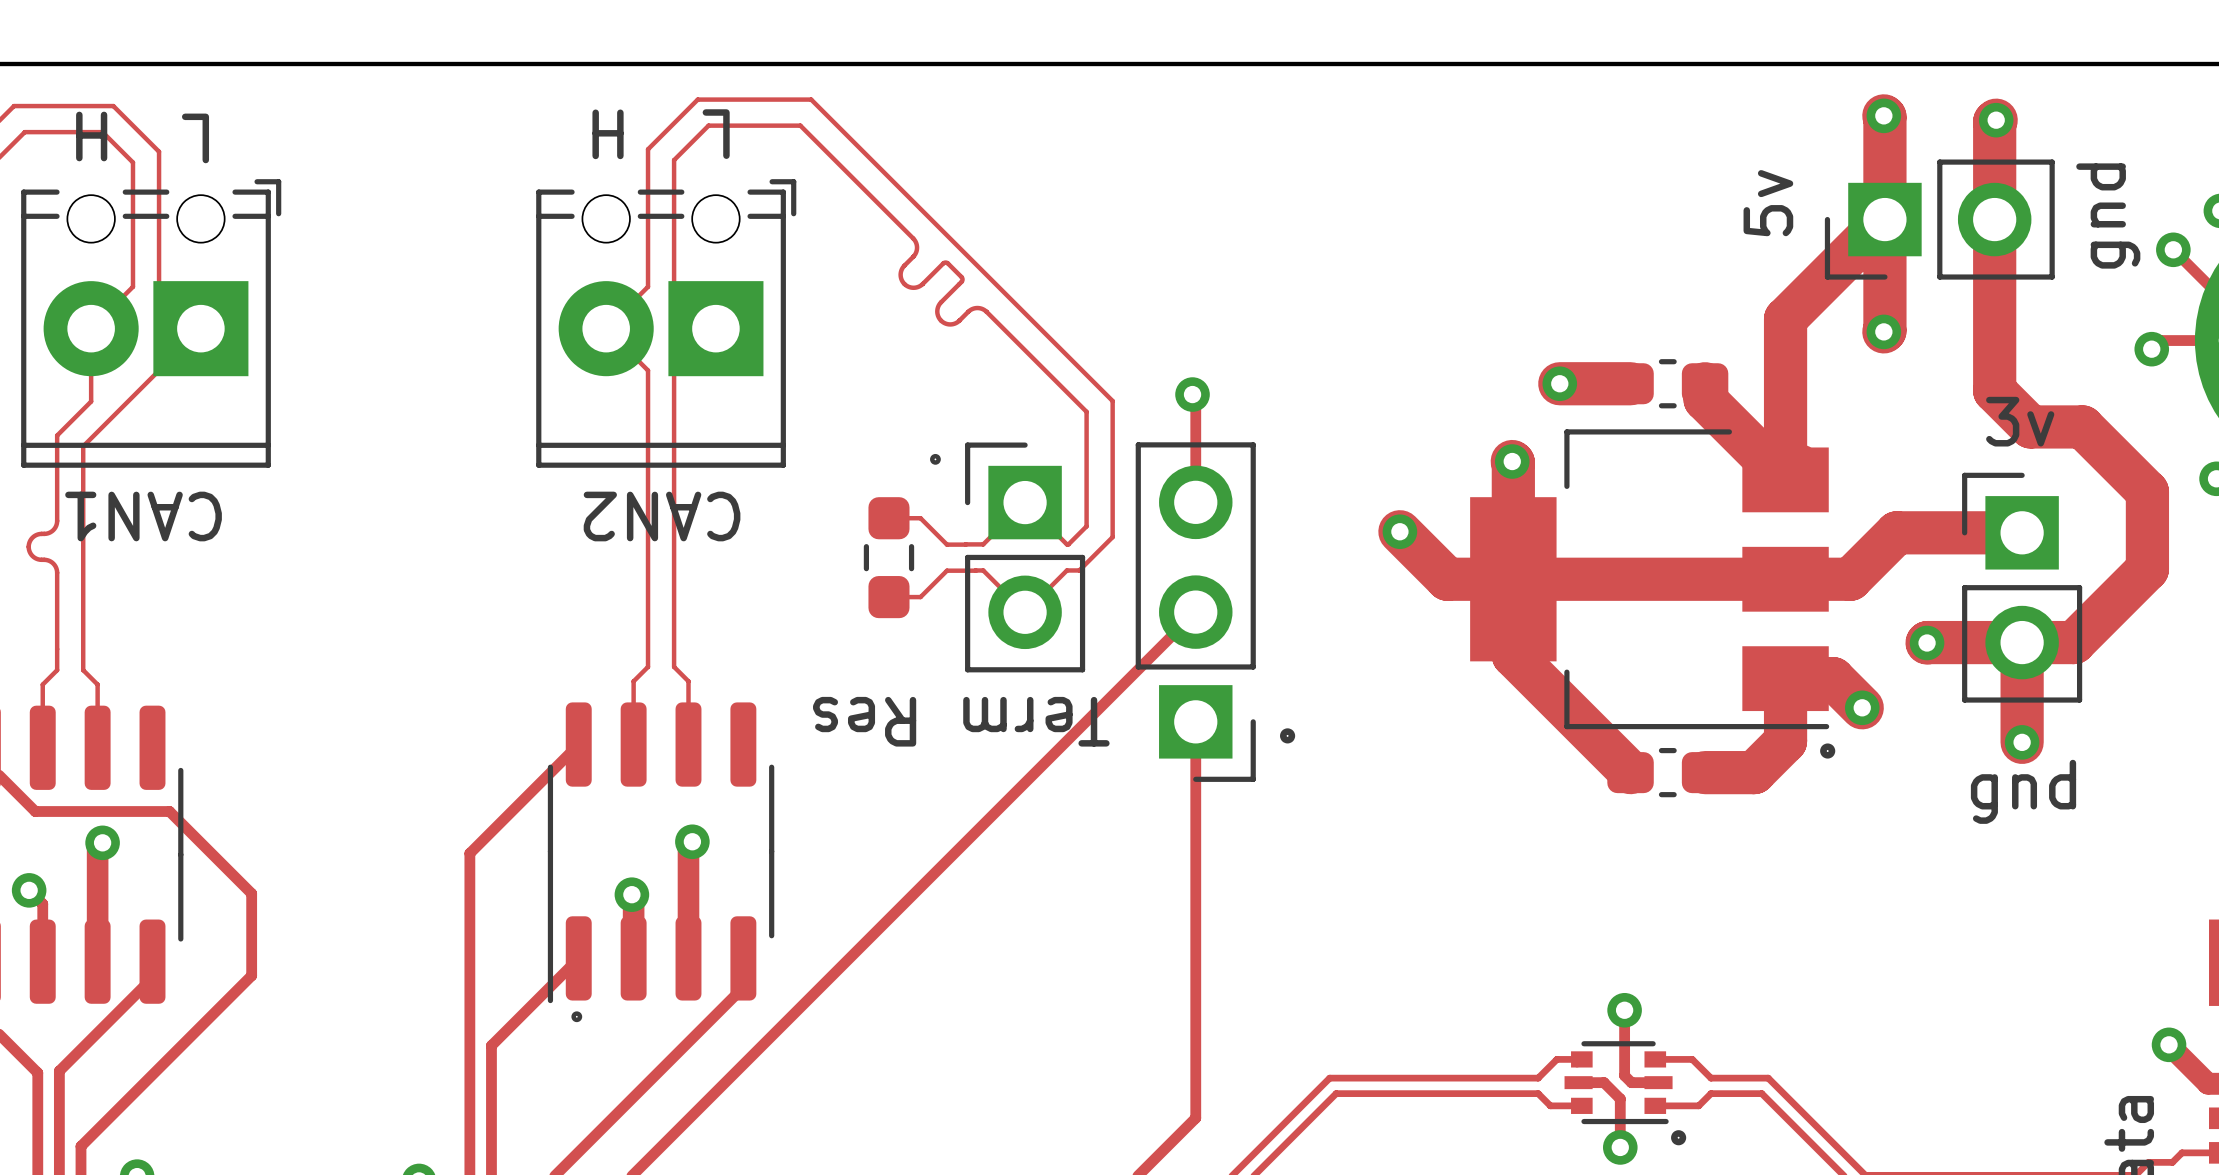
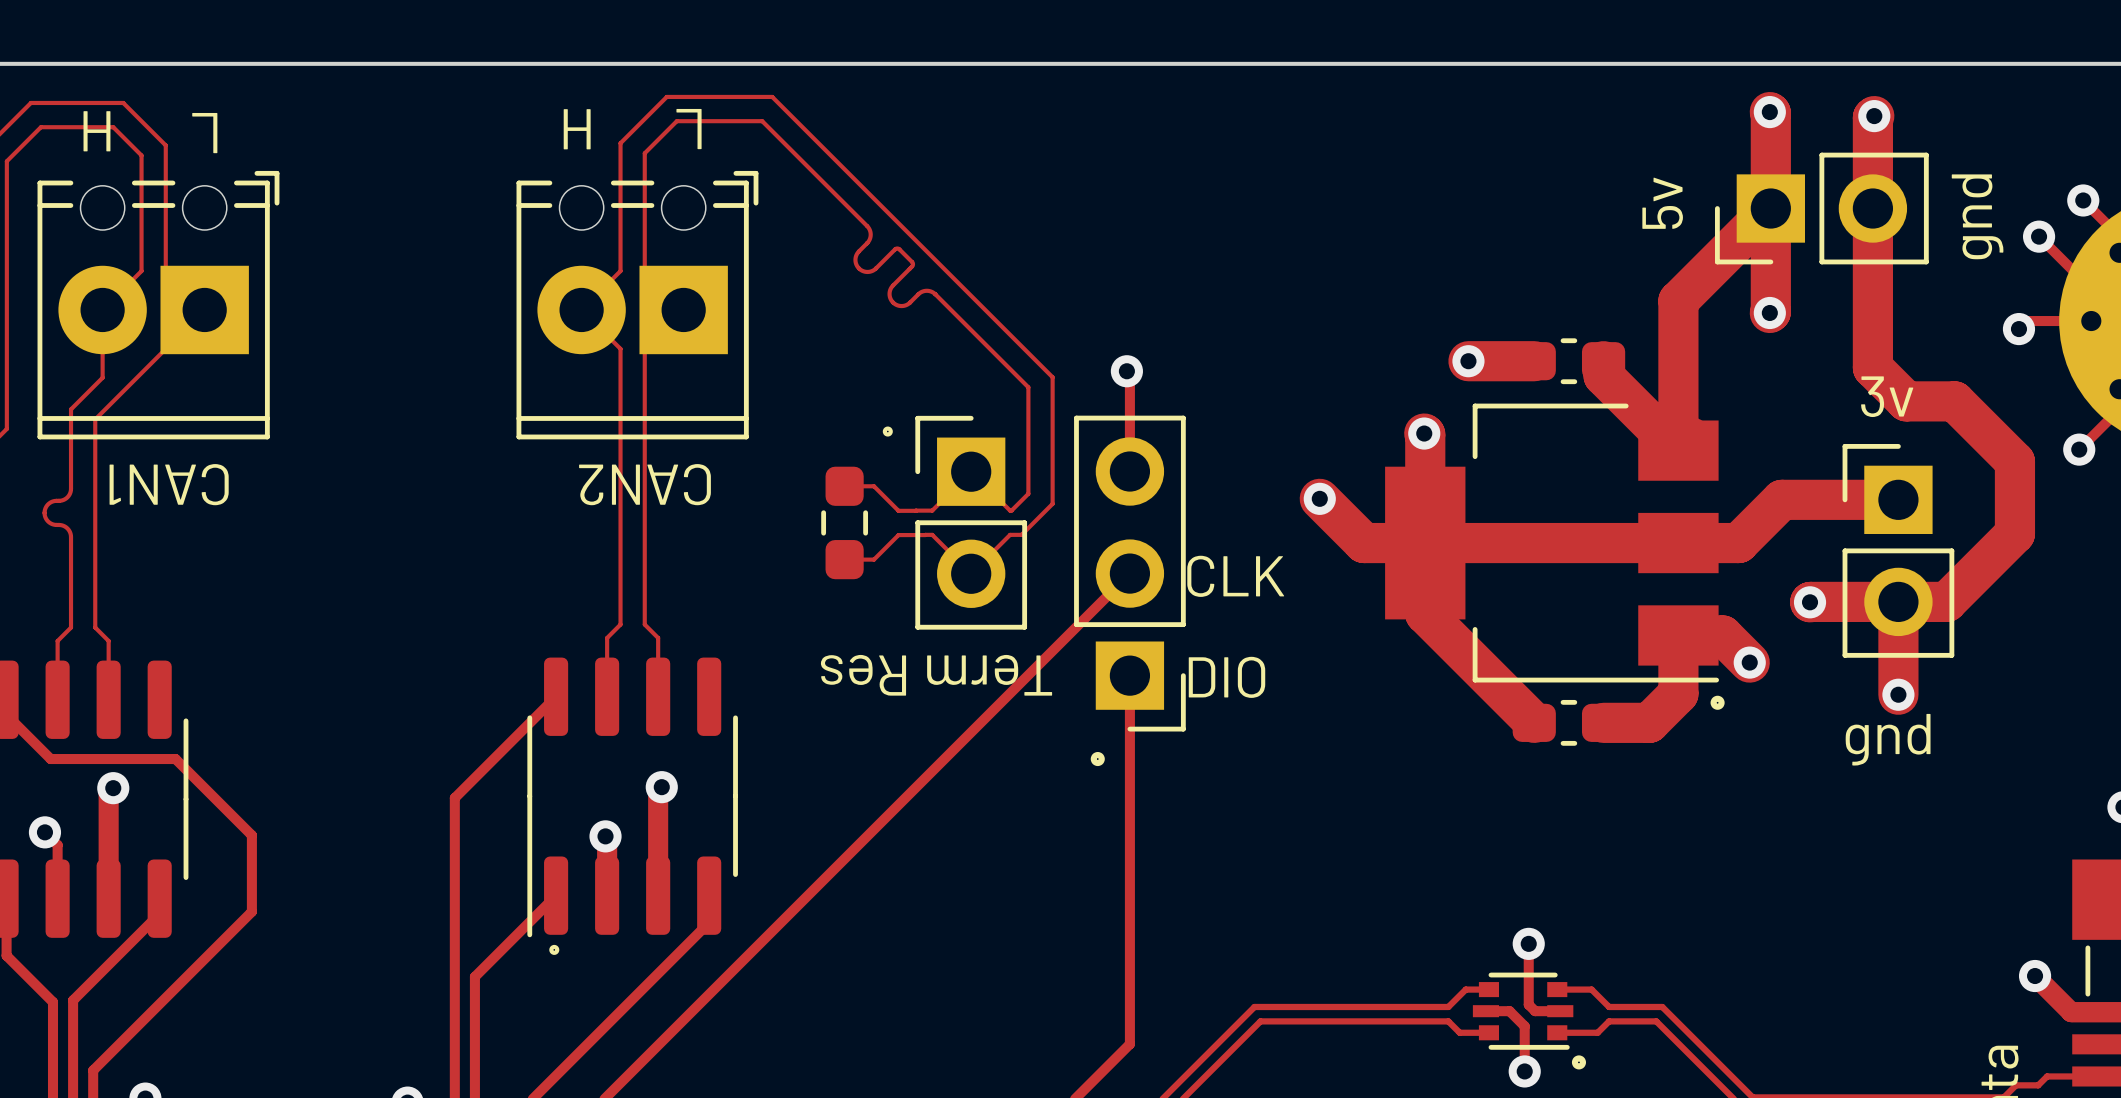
text: none -> CLK (1235, 576)
text: none -> DIO (1226, 677)
drawing position: (1287, 735) -> (1097, 759)

